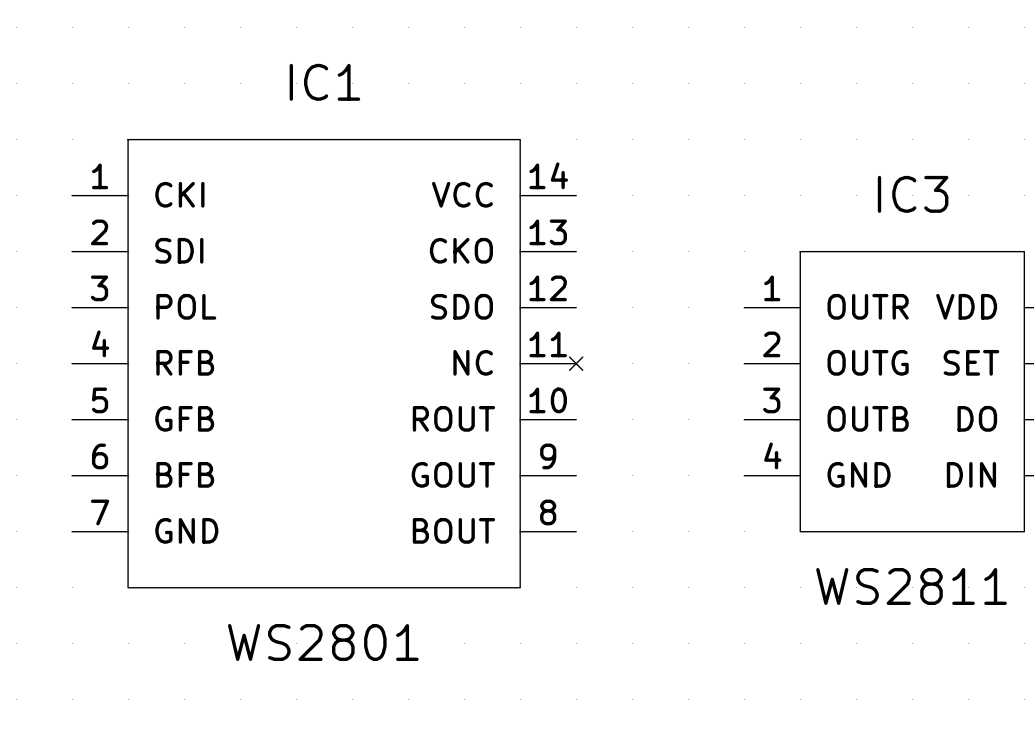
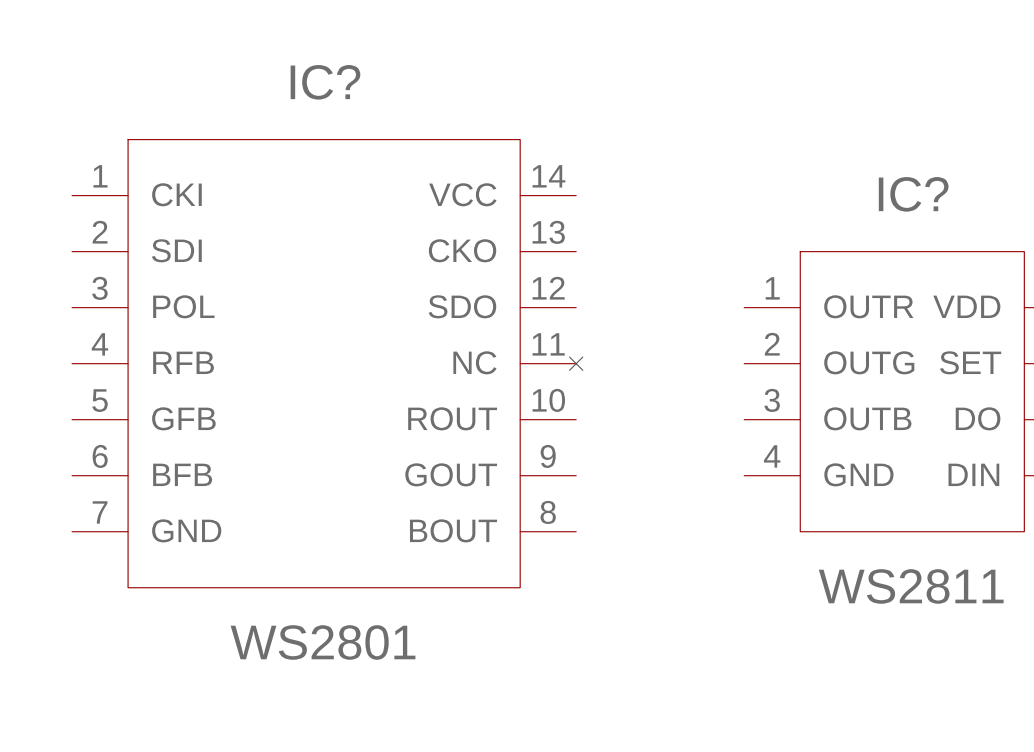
IC1 name: IC1 (324, 82) -> IC? (325, 82)
IC3 name: IC3 (913, 194) -> IC? (913, 194)

